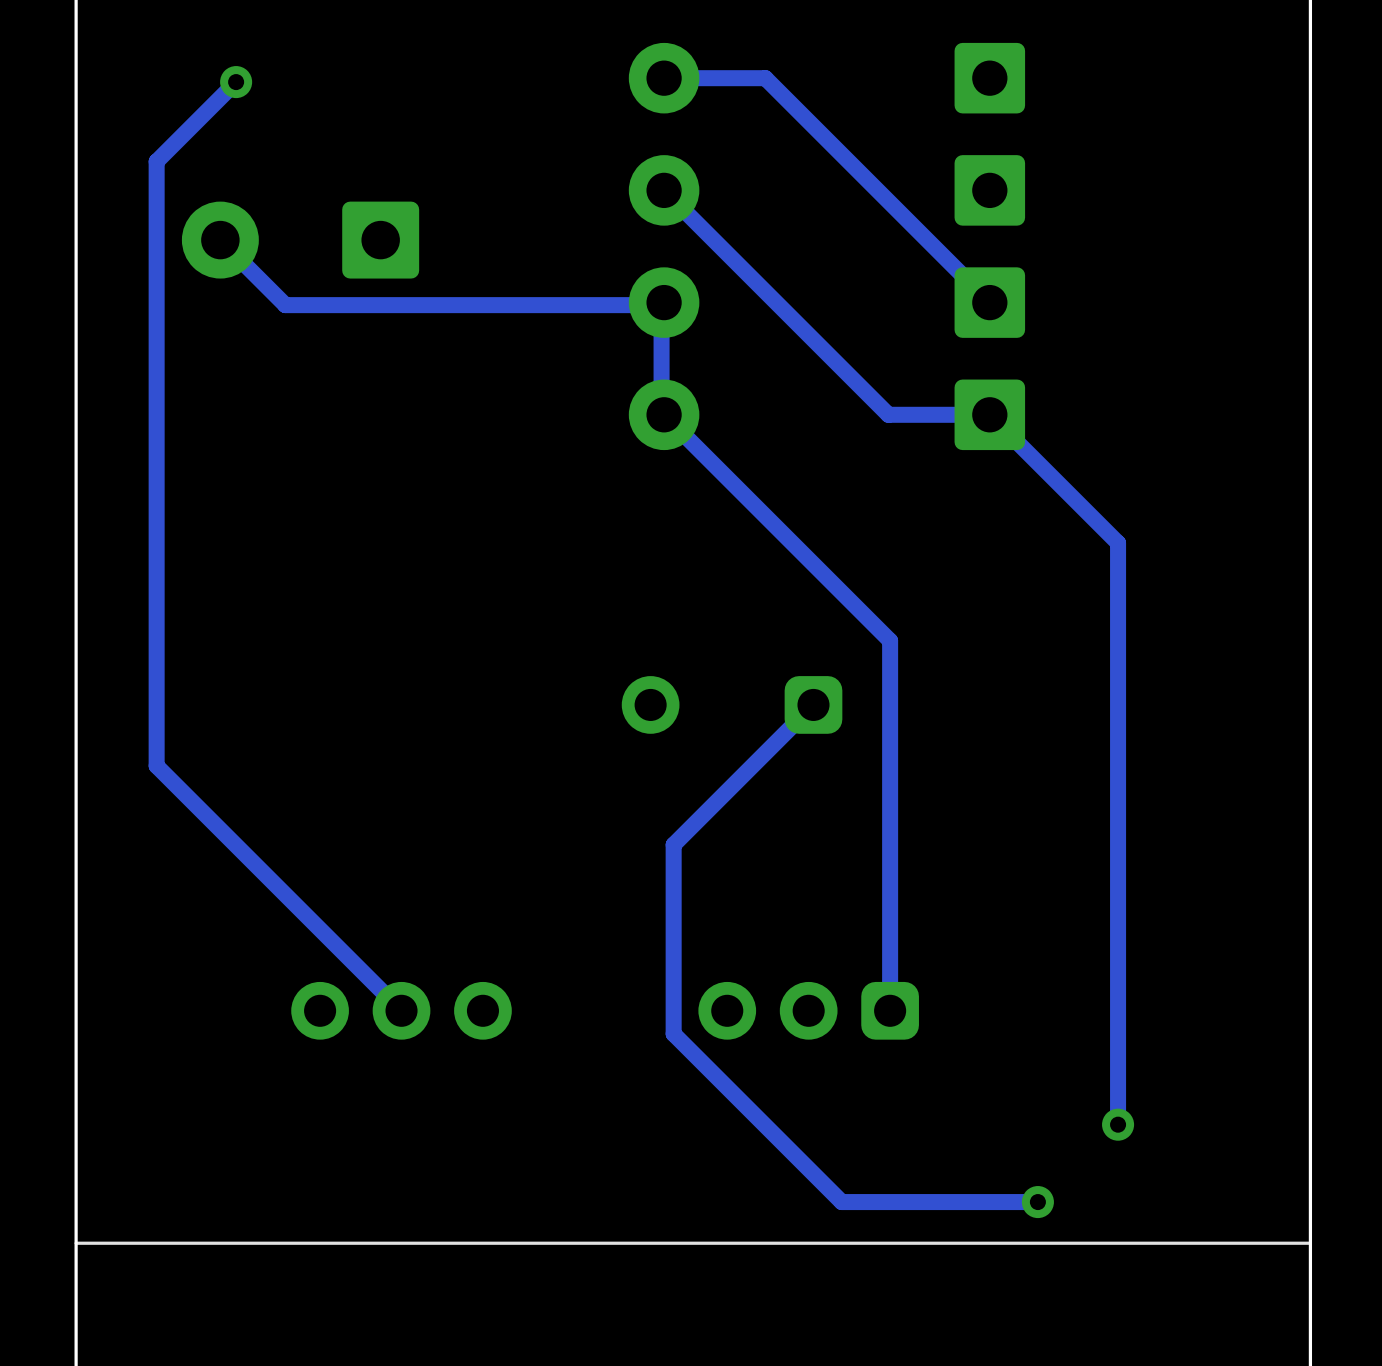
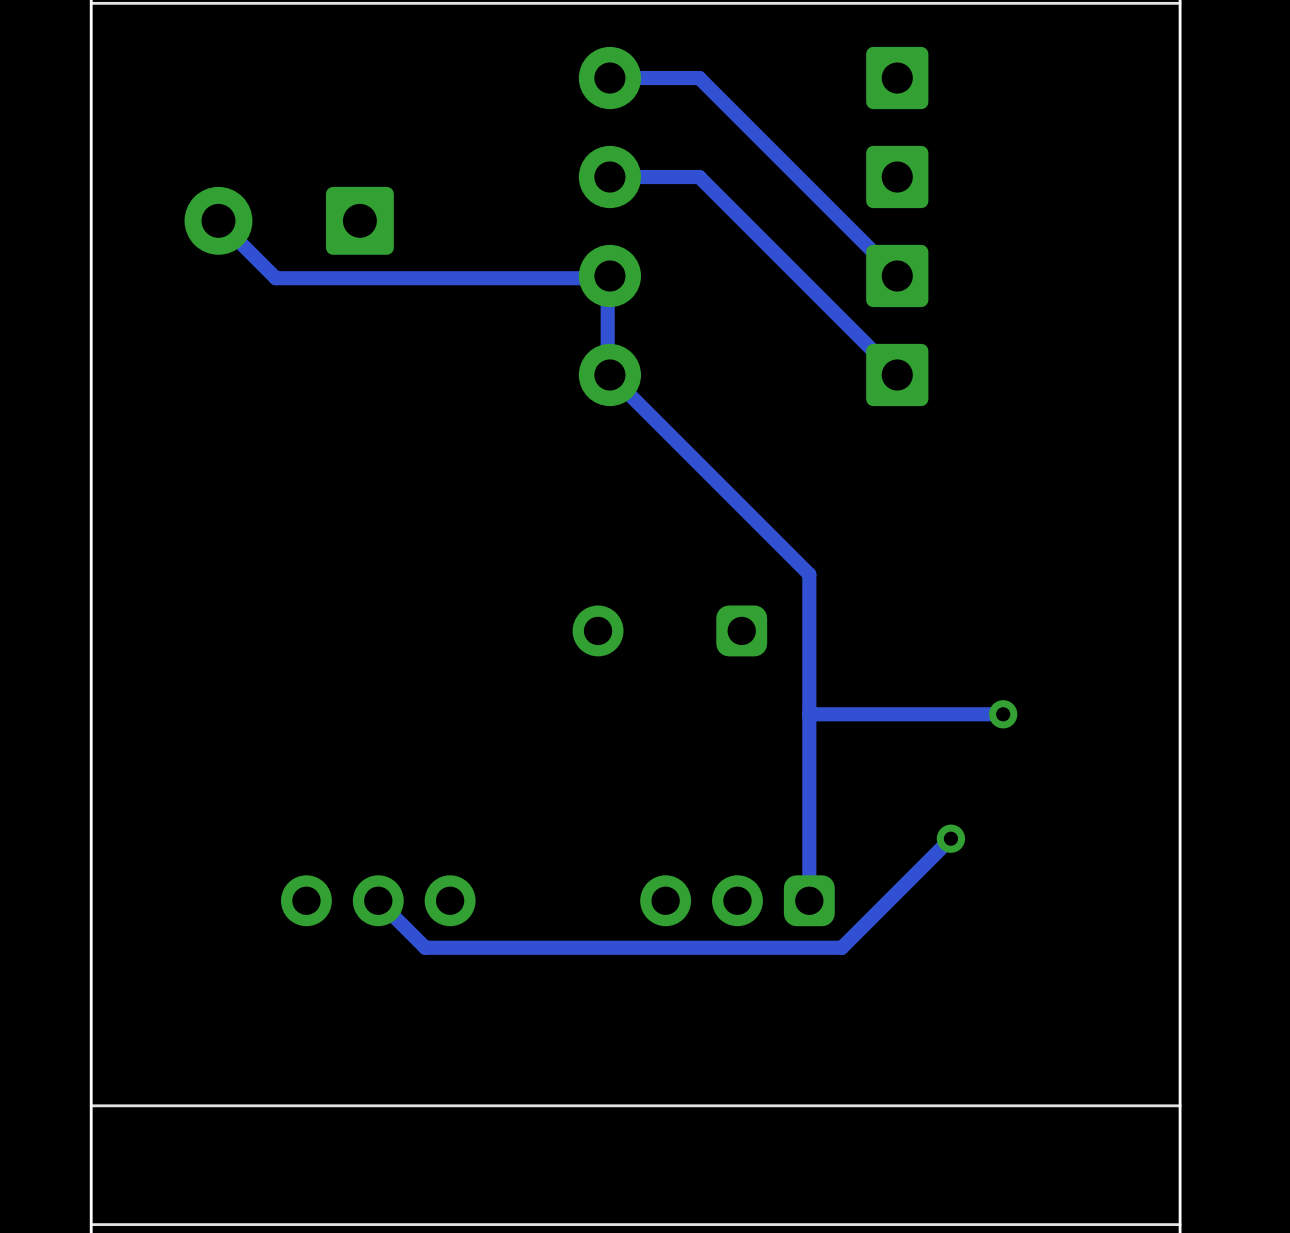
track: (236, 82) (156, 161) (156, 765) (401, 1010) -> (950, 838) (841, 947) (425, 947) (378, 900)
via: (236, 82) -> none
track: (664, 190) (888, 414) (989, 414) (1118, 543) (1118, 1124) -> (609, 177) (699, 177) (897, 374)
track: (813, 704) (673, 844) (673, 1033) (841, 1202) (1037, 1202) -> none
track: none -> (1003, 714) (809, 714)
via: none -> (1003, 714)
via: none -> (950, 838)
via: (1118, 1124) -> none
via: (1037, 1202) -> none

